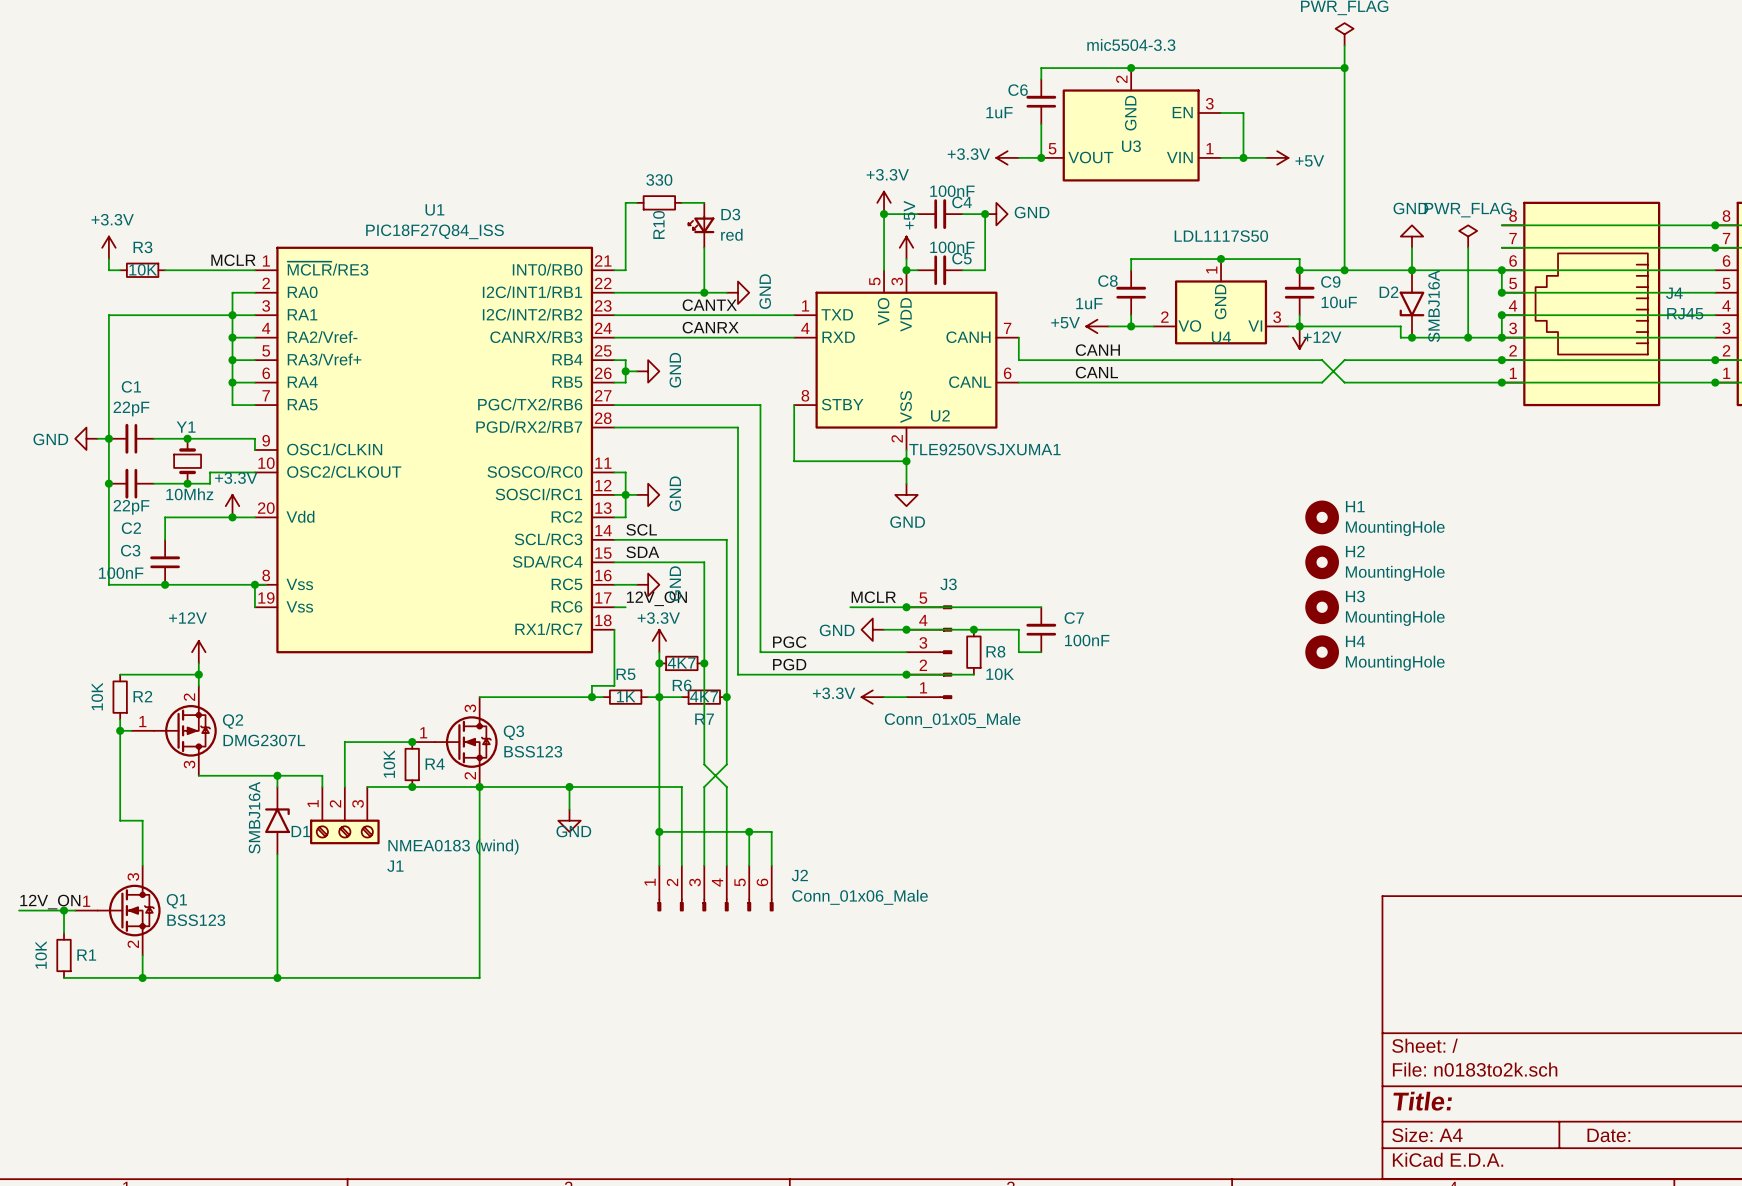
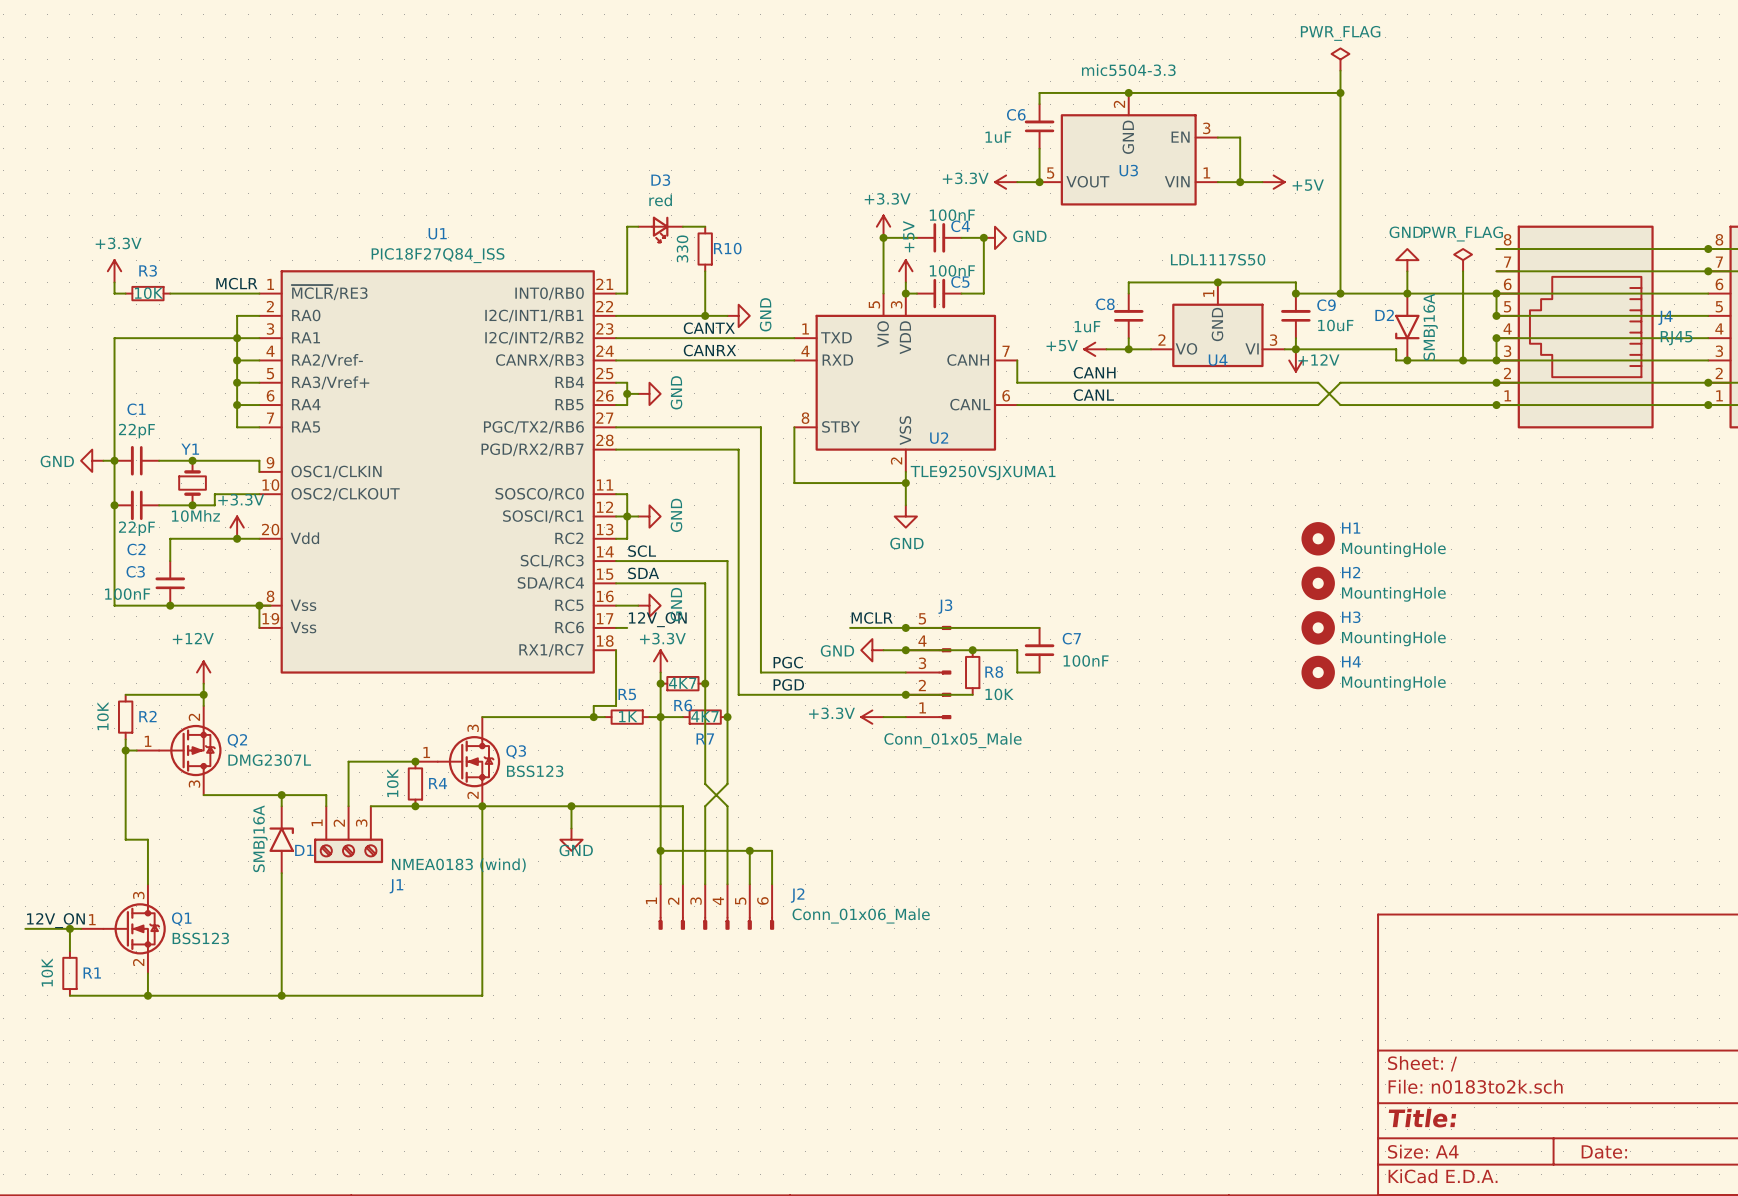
R10 value position: 330 (659, 179) -> 330 (682, 248)
R10 rotation: 0° (659, 202) -> 90° clockwise (705, 249)
R10 position: (659, 202) -> (705, 249)
D3 name position: D3 (730, 214) -> D3 (660, 180)
R10 name position: R10 (658, 224) -> R10 (727, 248)
D3 rotation: 0° (701, 224) -> 90° counterclockwise (660, 229)
D3 position: (701, 225) -> (660, 229)

